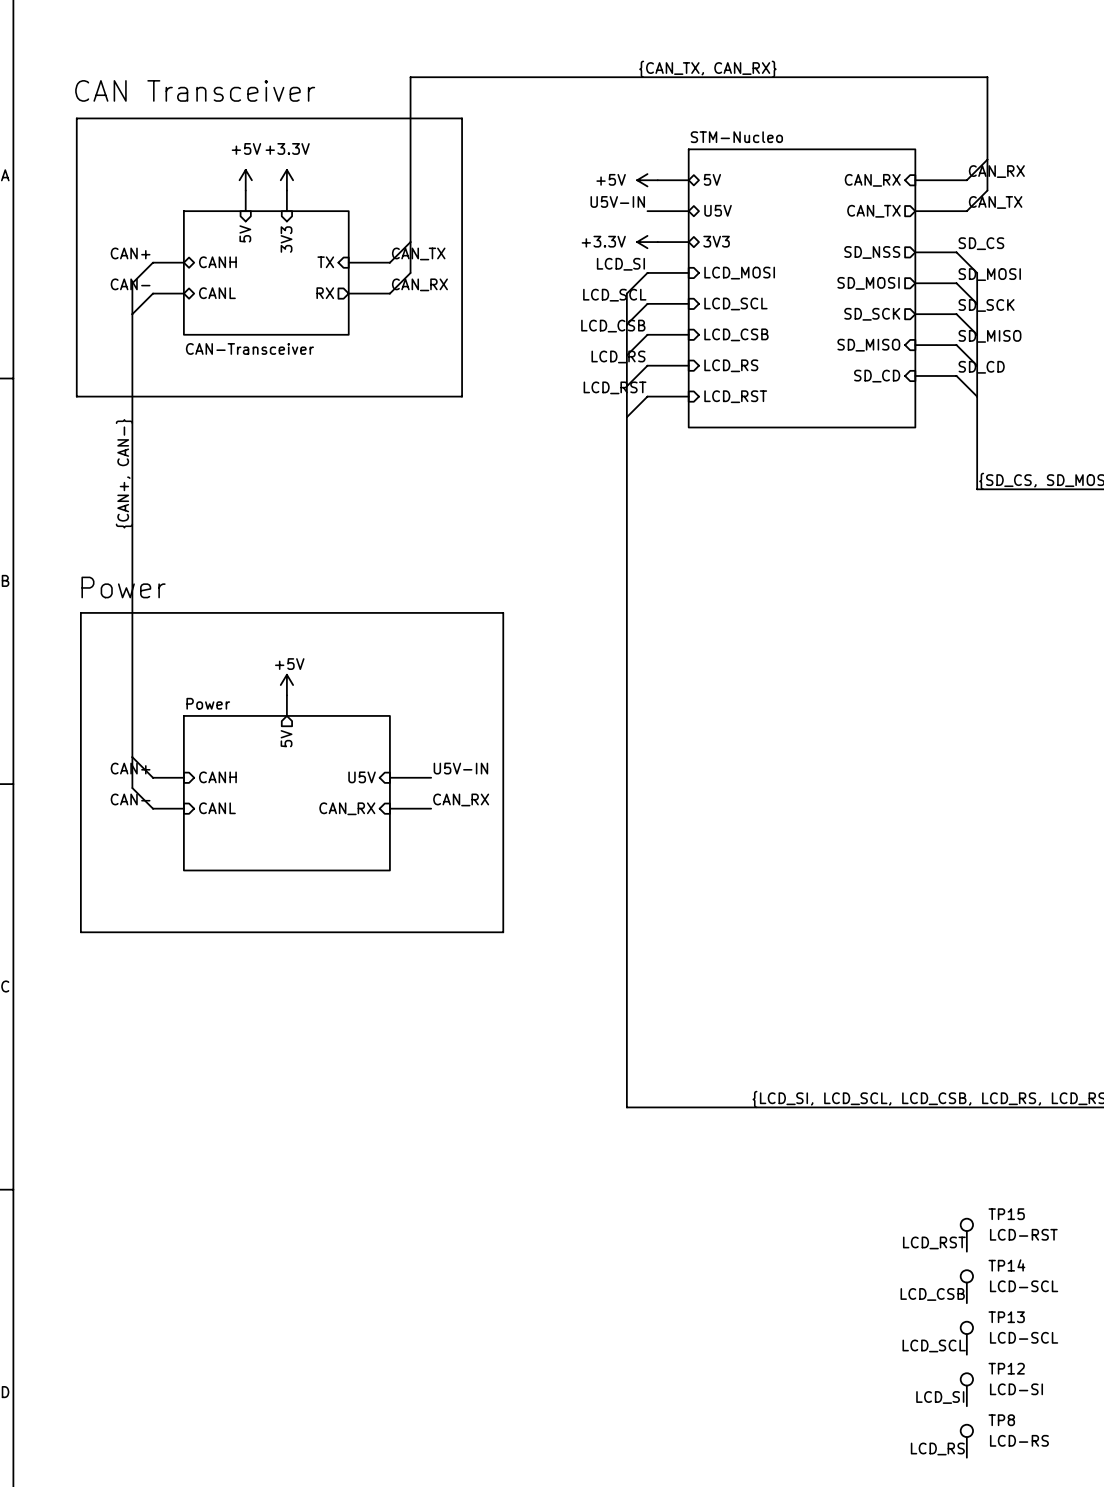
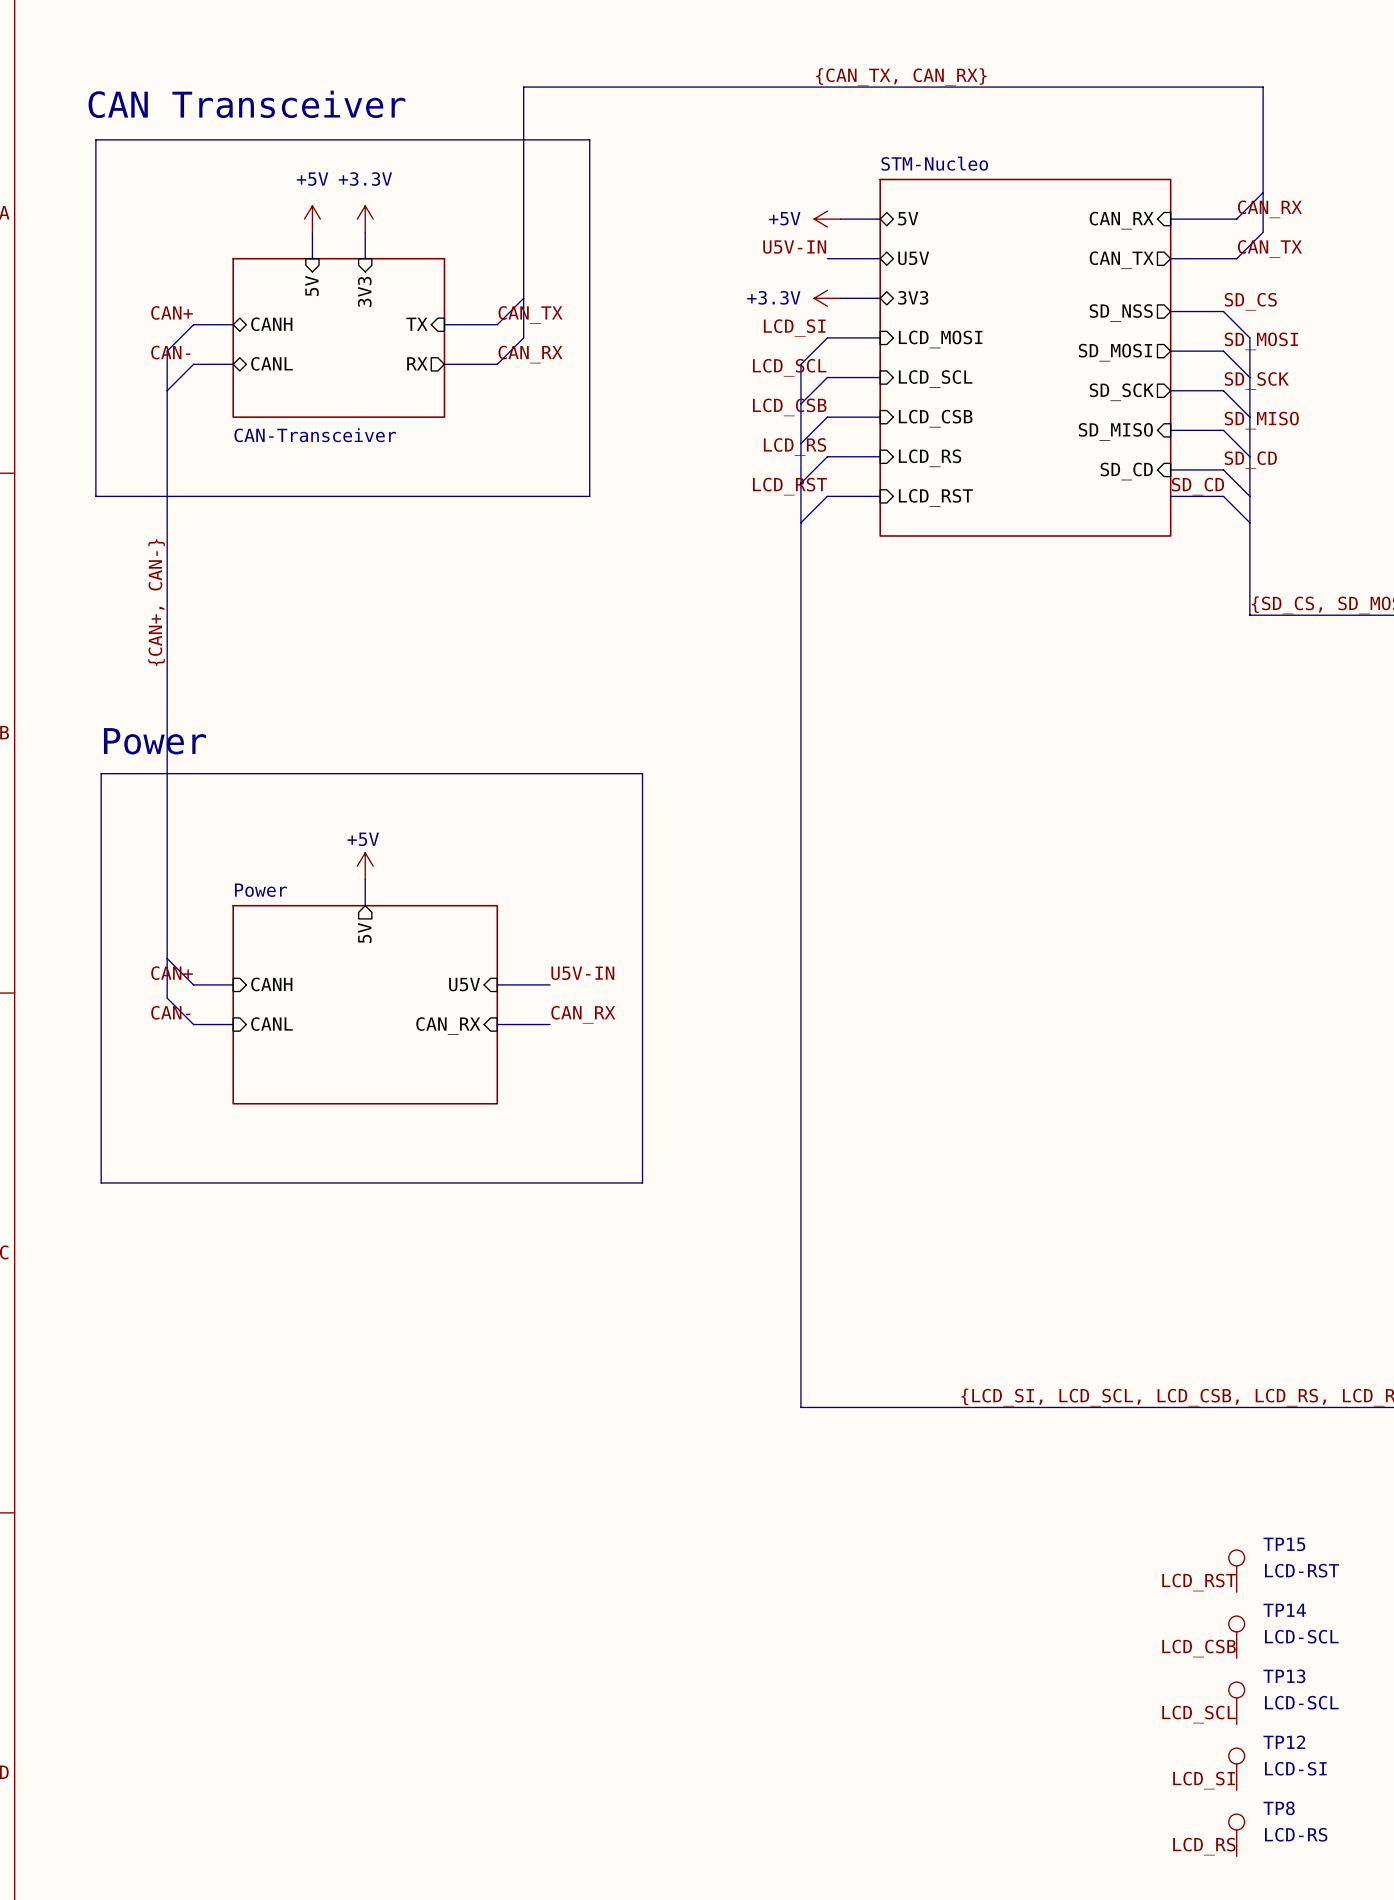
label: none -> SD_CD (1197, 486)
wire: none -> (1170, 496) (1223, 496) (1249, 522)

